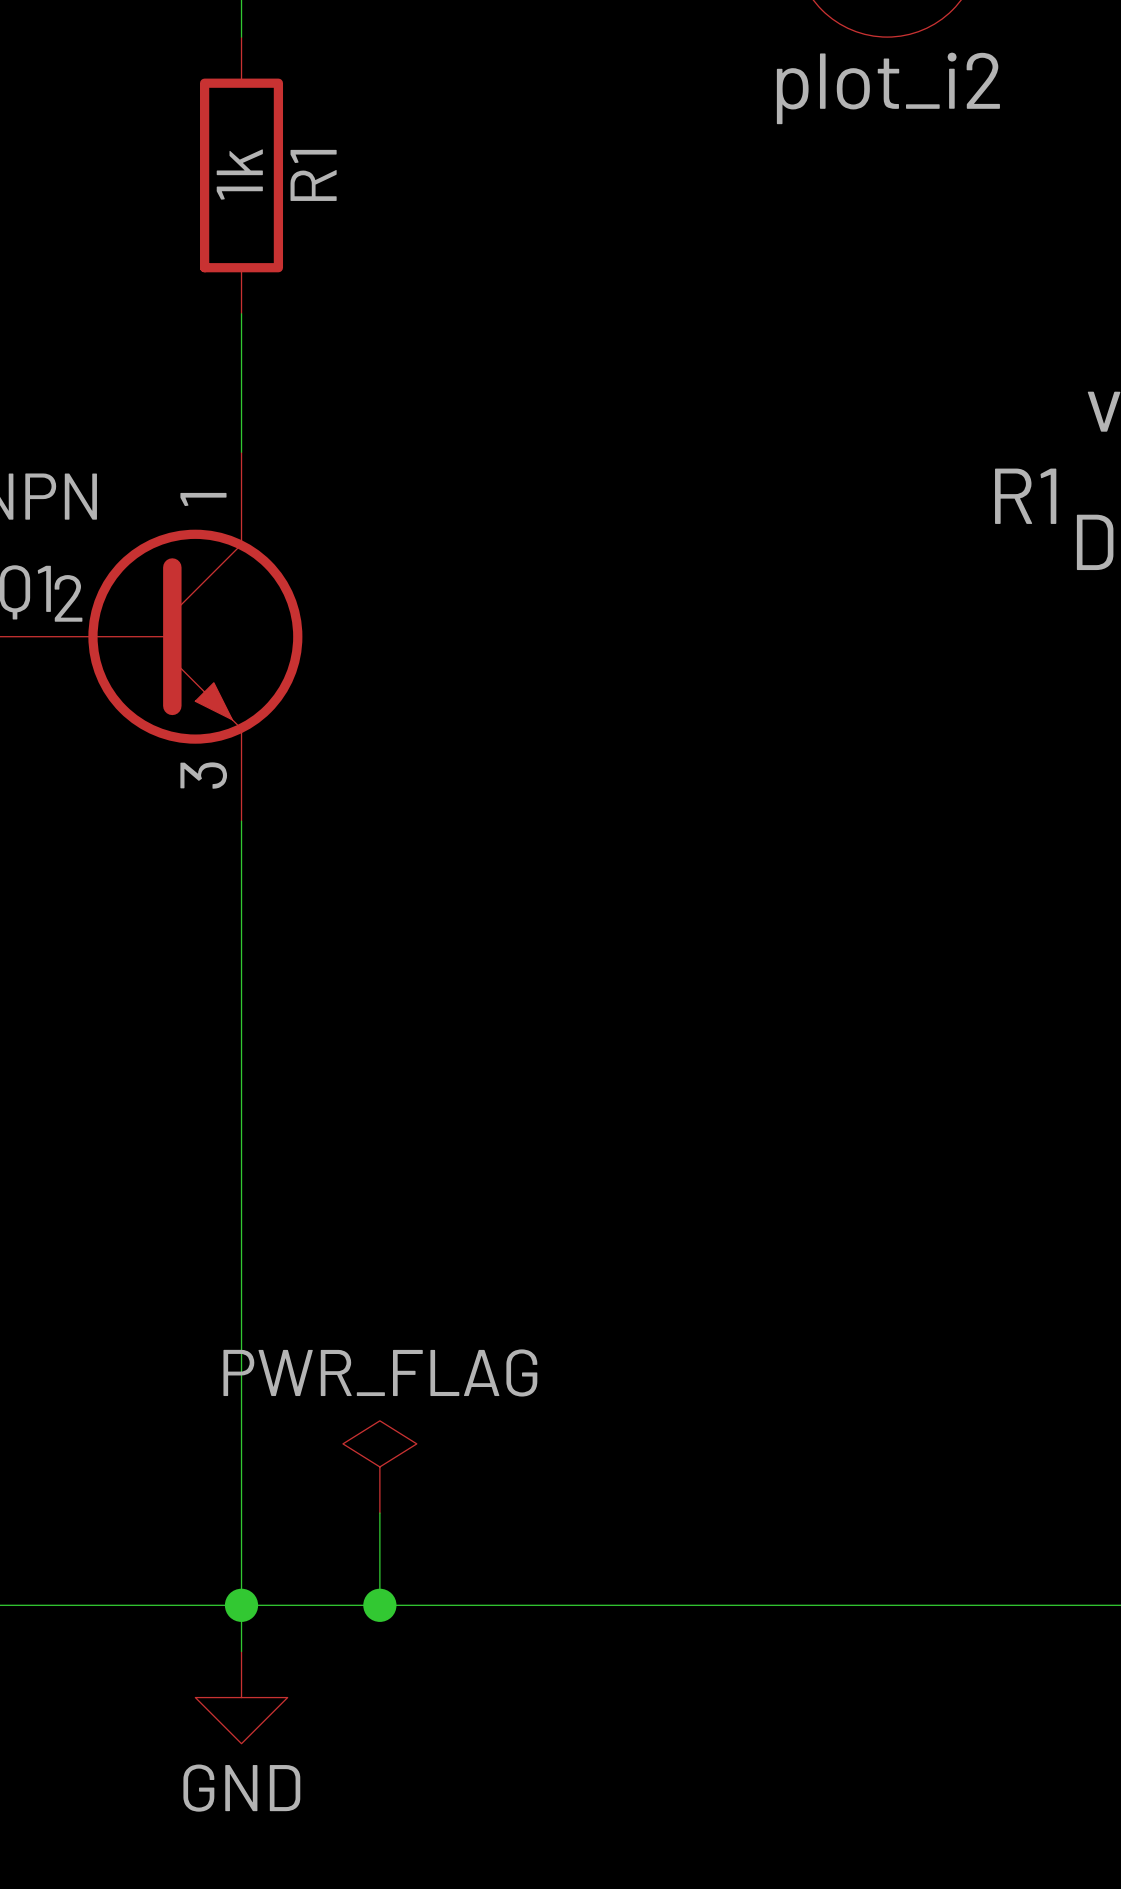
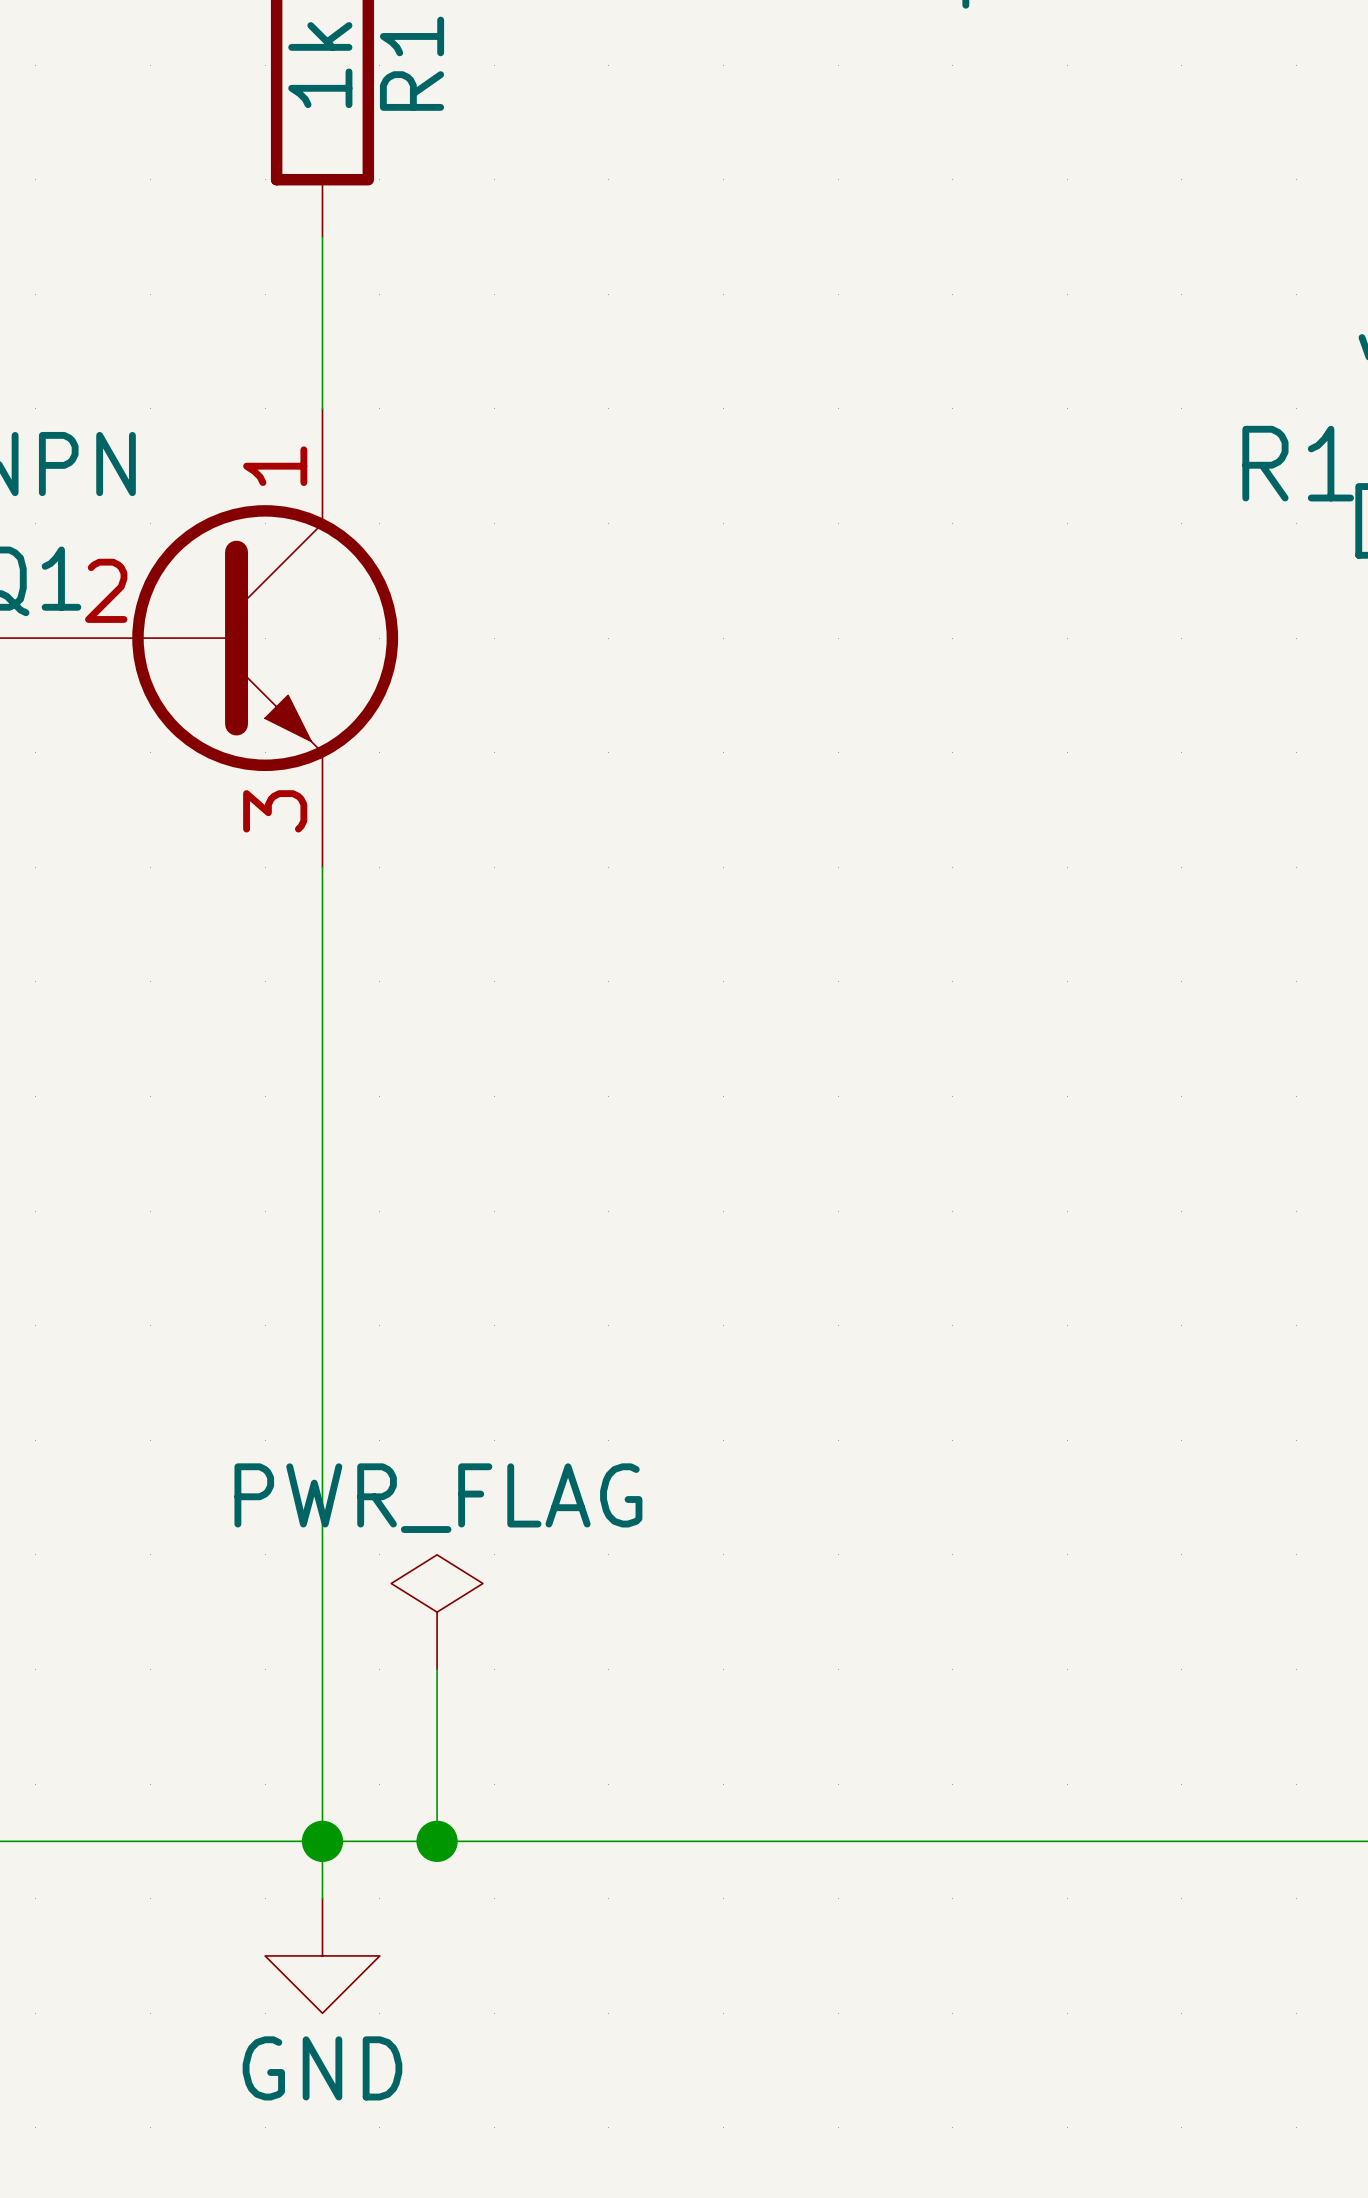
wire: none -> (437, 1669) (437, 1841)
power symbol position: PWR_FLAG (379, 1466) -> PWR_FLAG (437, 1612)
wire: (379, 1513) (379, 1605) -> none
junction position: (379, 1605) -> (437, 1841)

